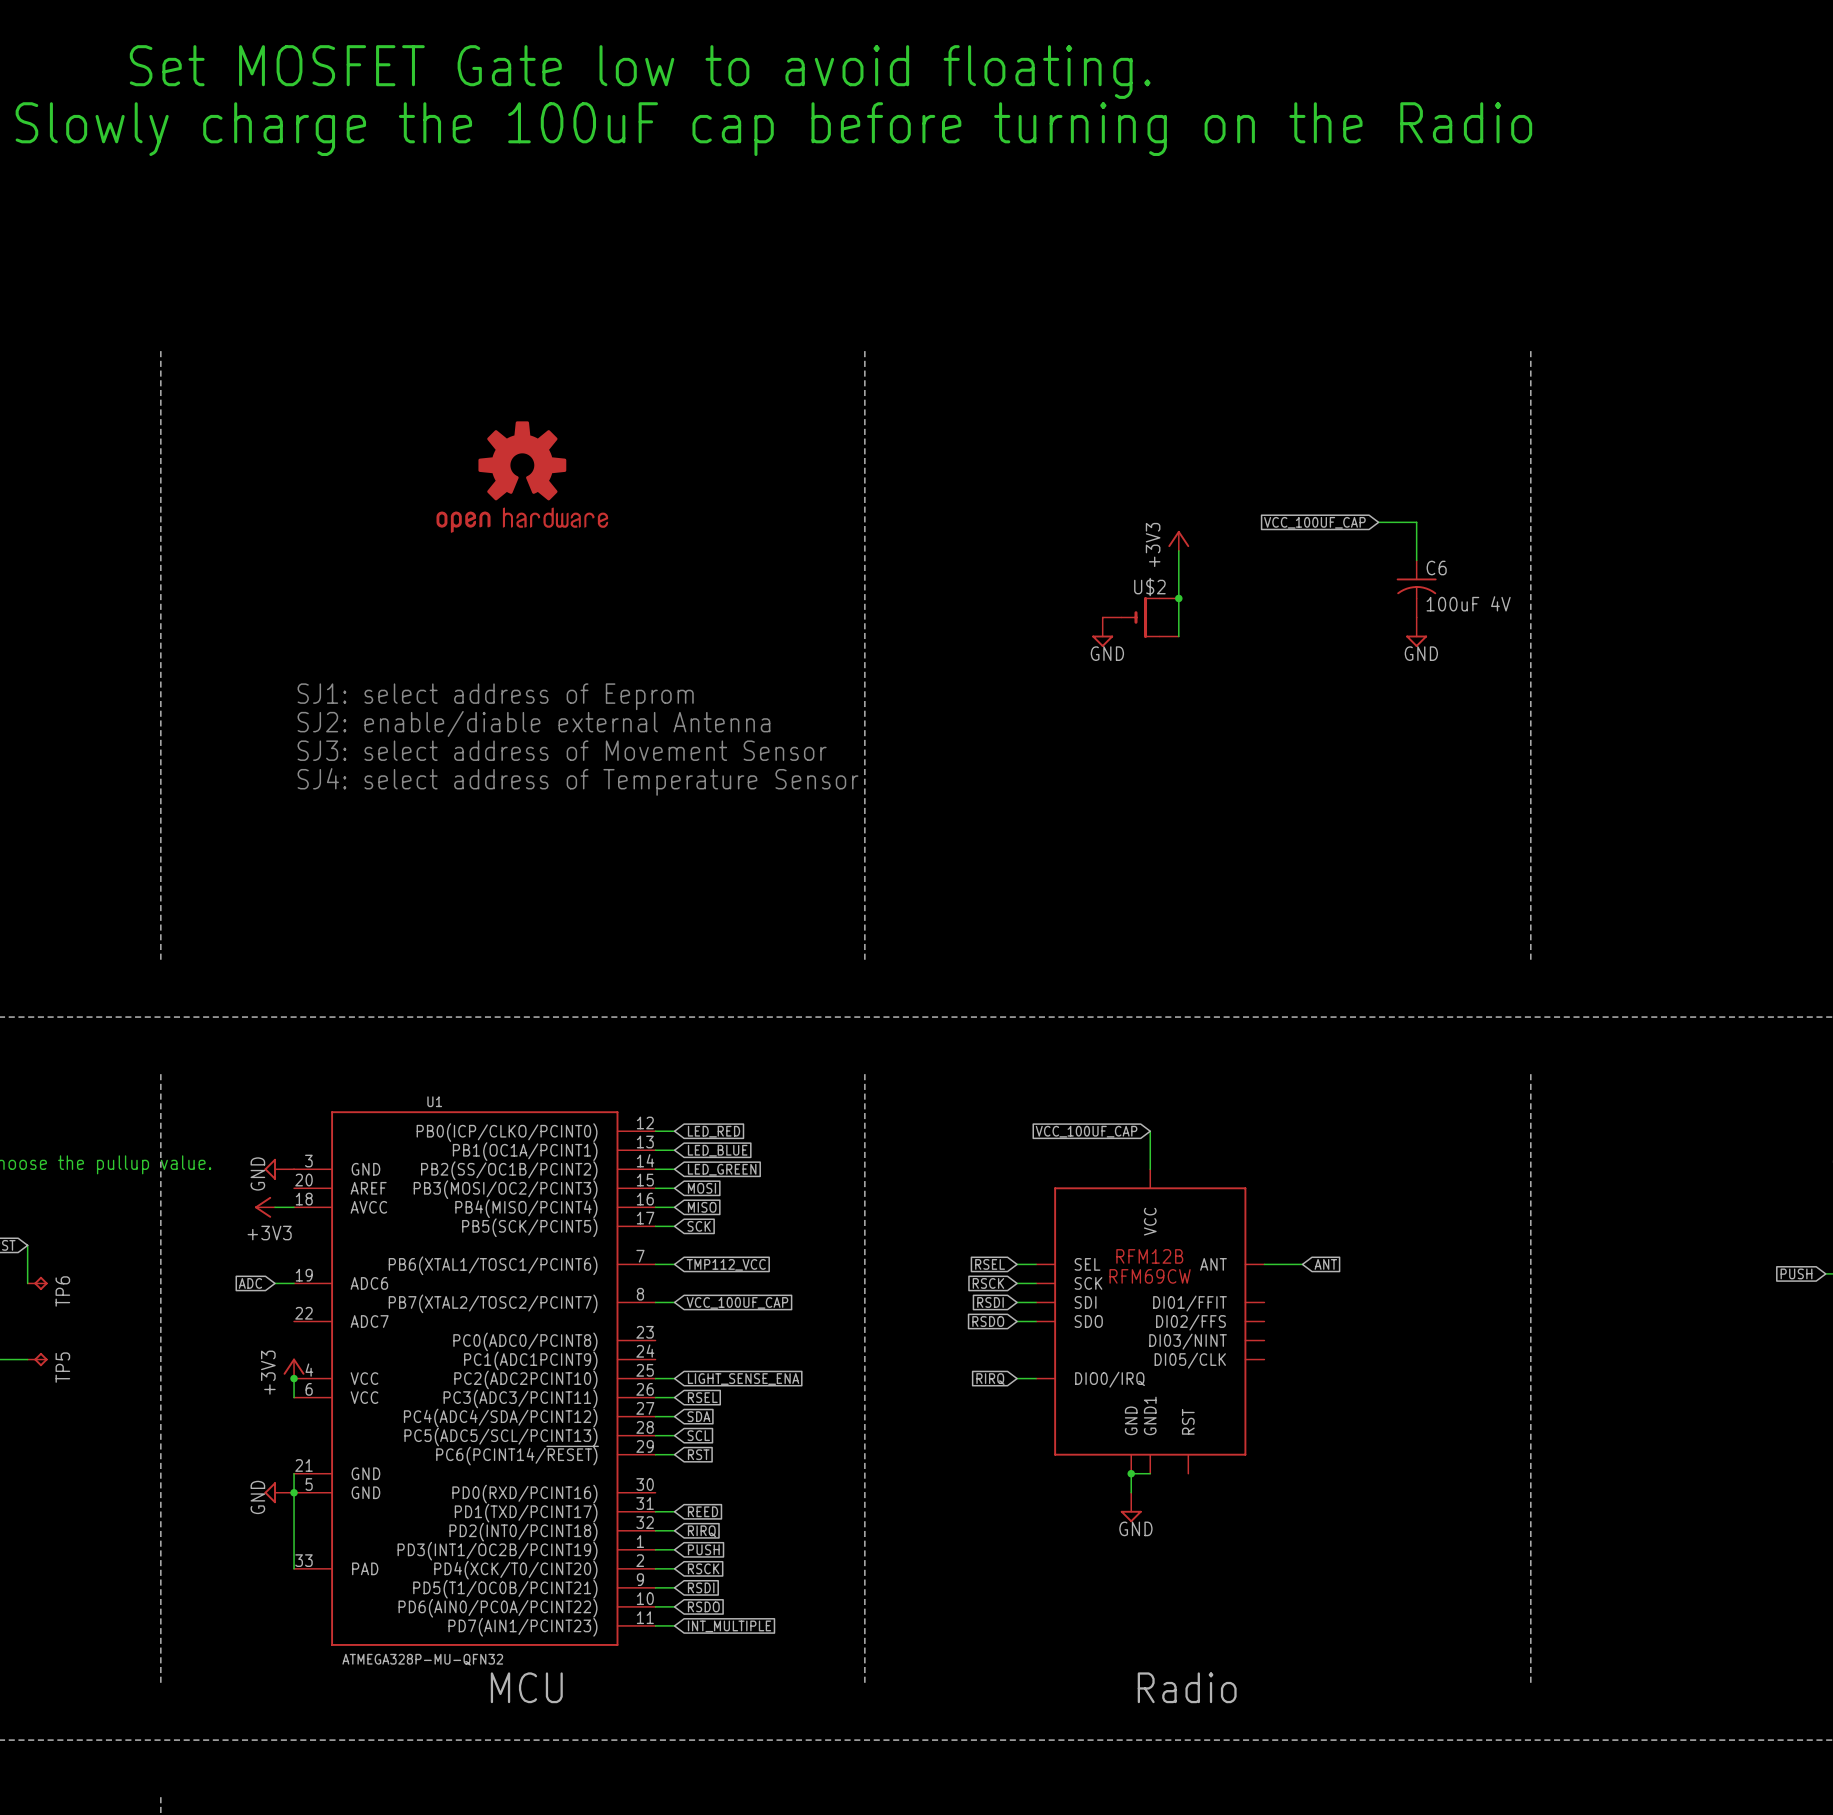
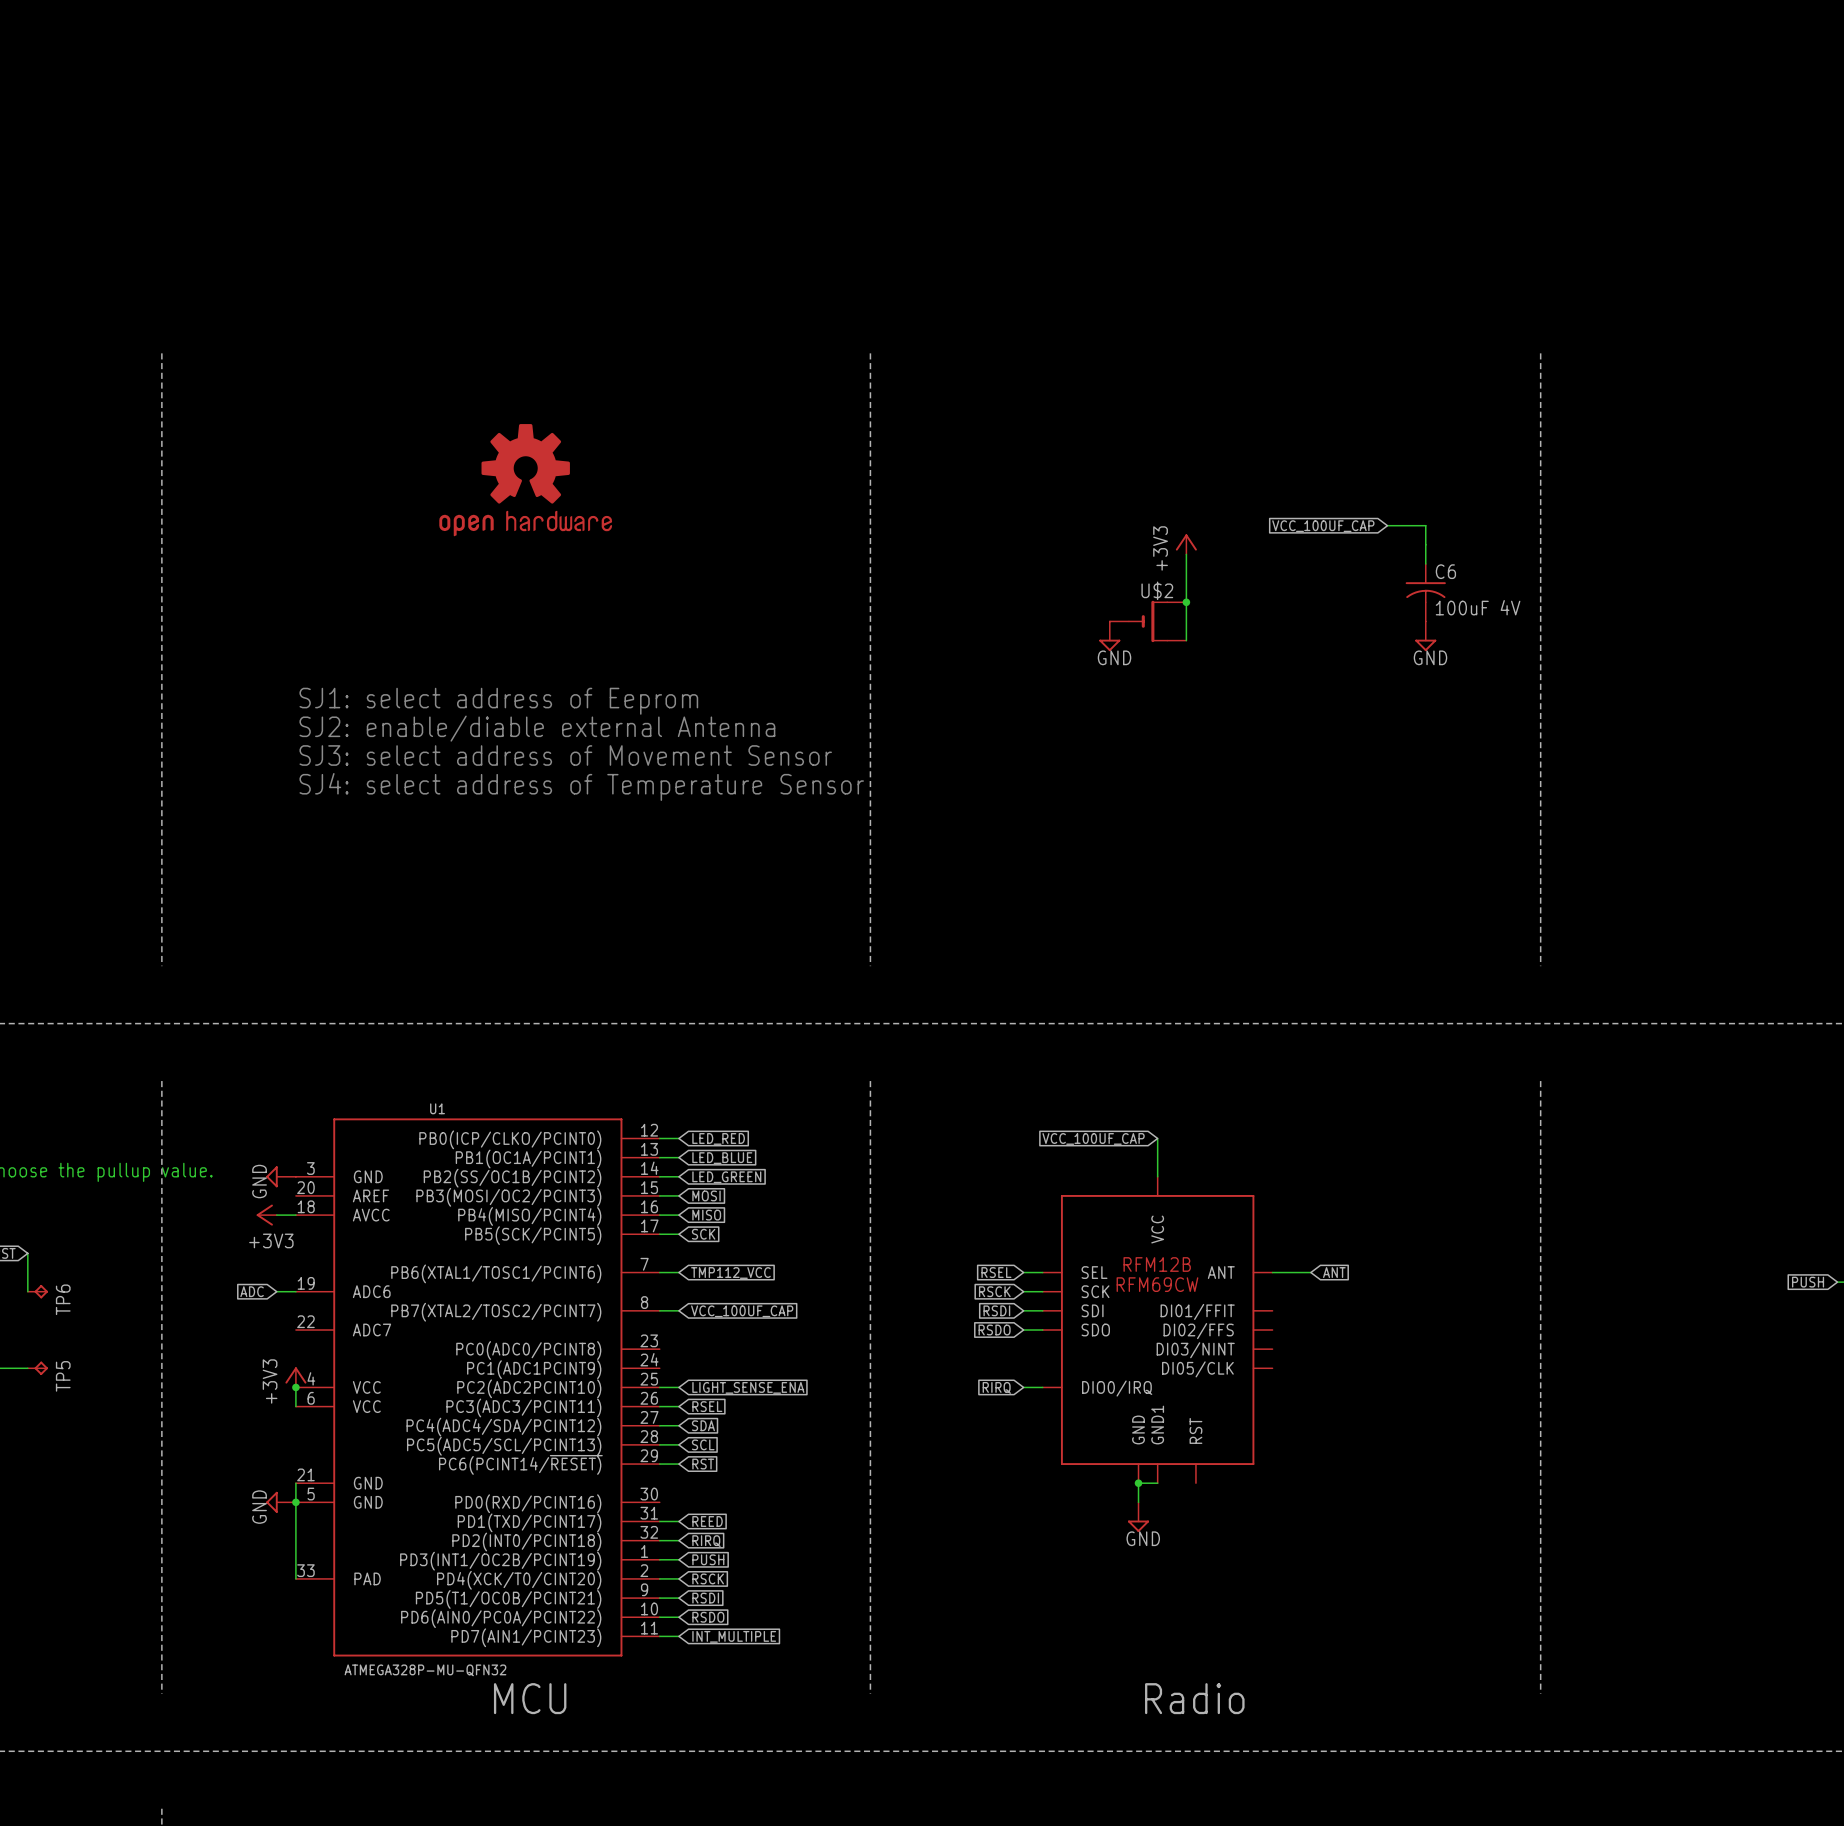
text: Set MOSFET Gate low to avoid floating. (640, 72) -> none
text: Slowly charge the 100uF cap before turning on the Radio (773, 129) -> none

